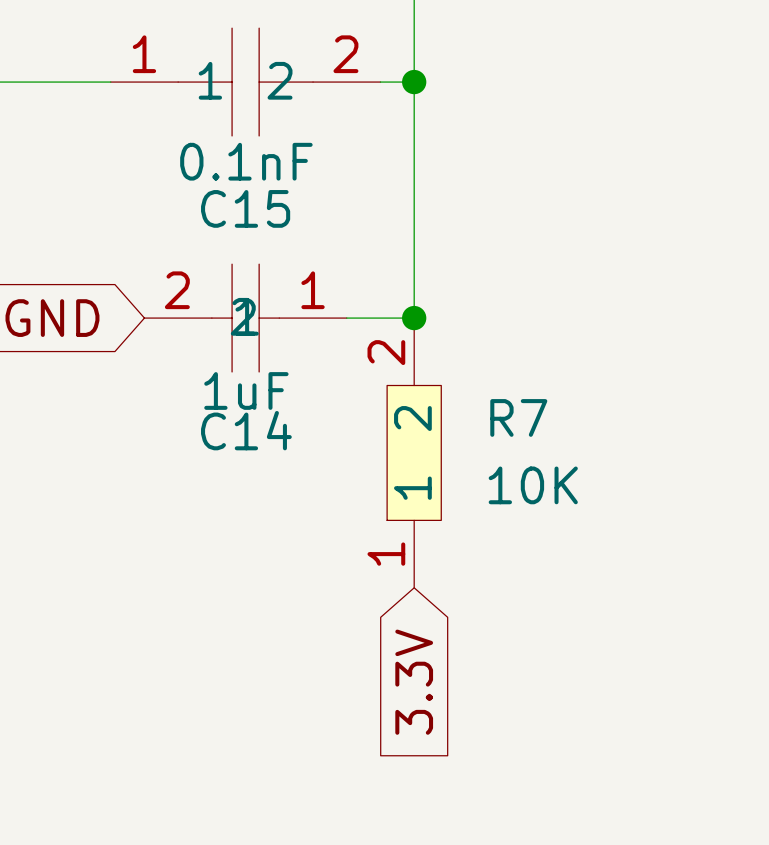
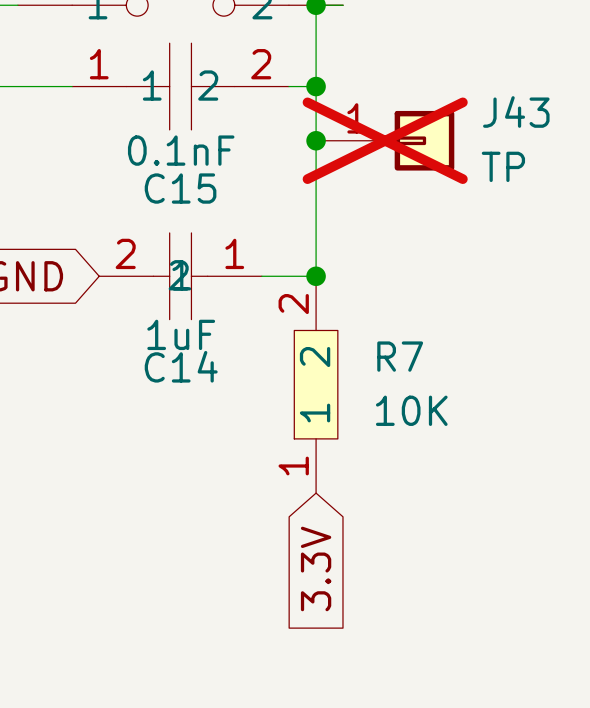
junction: none -> (316, 140)
J43: none -> TP (385, 140)

